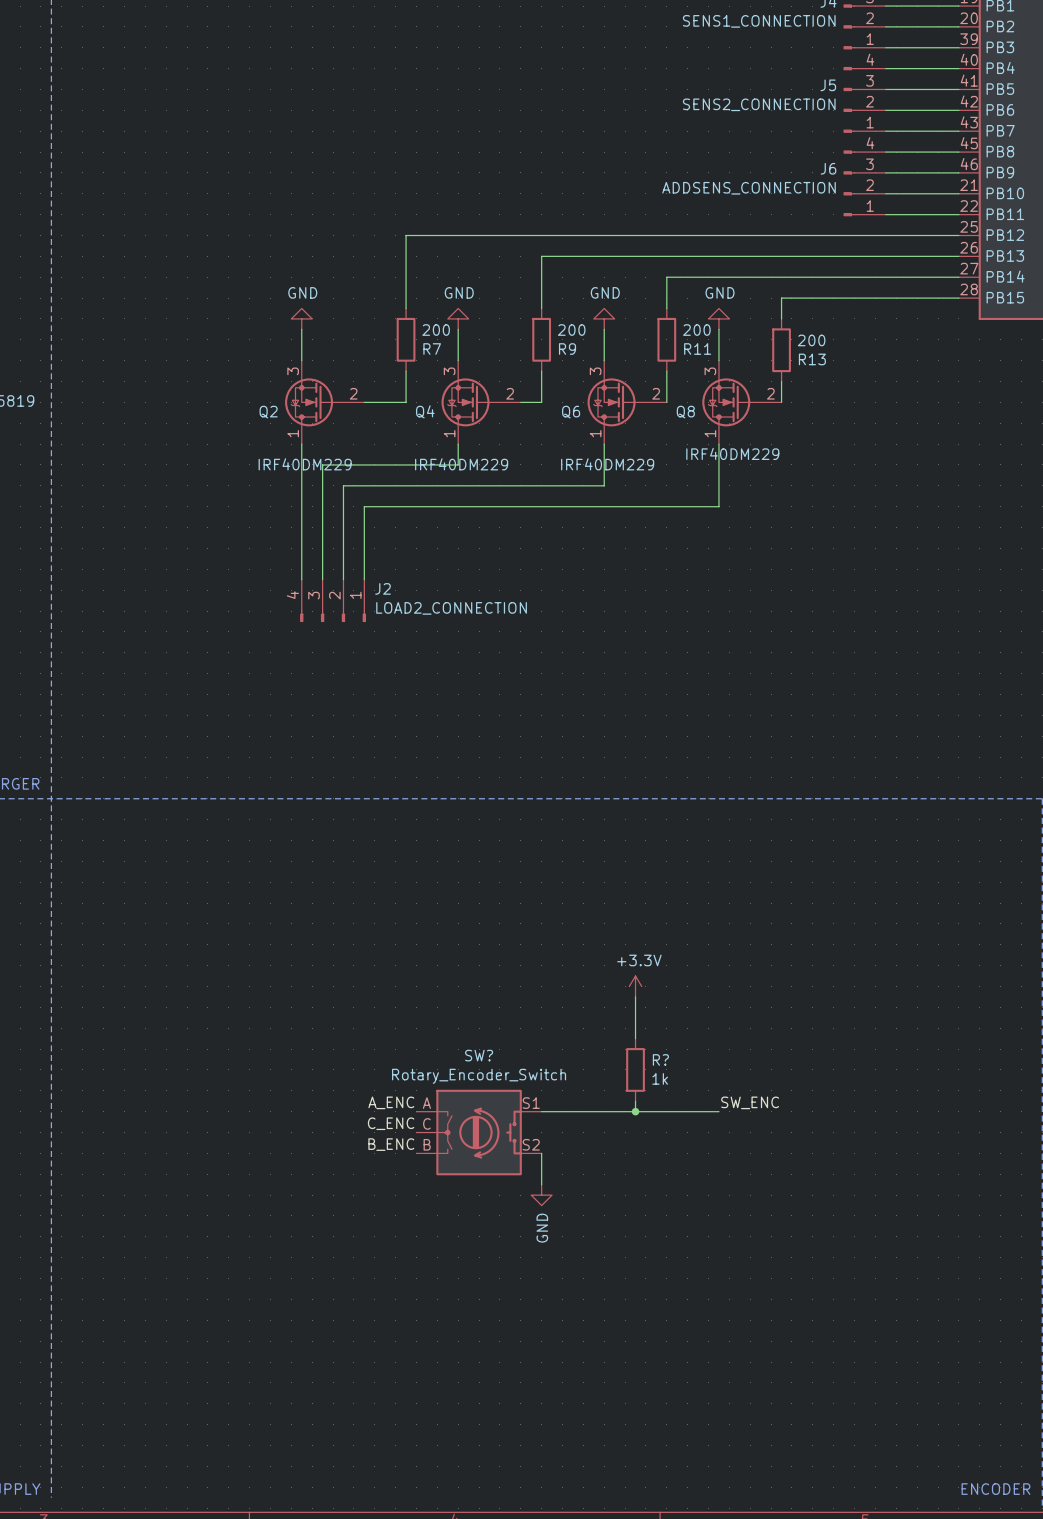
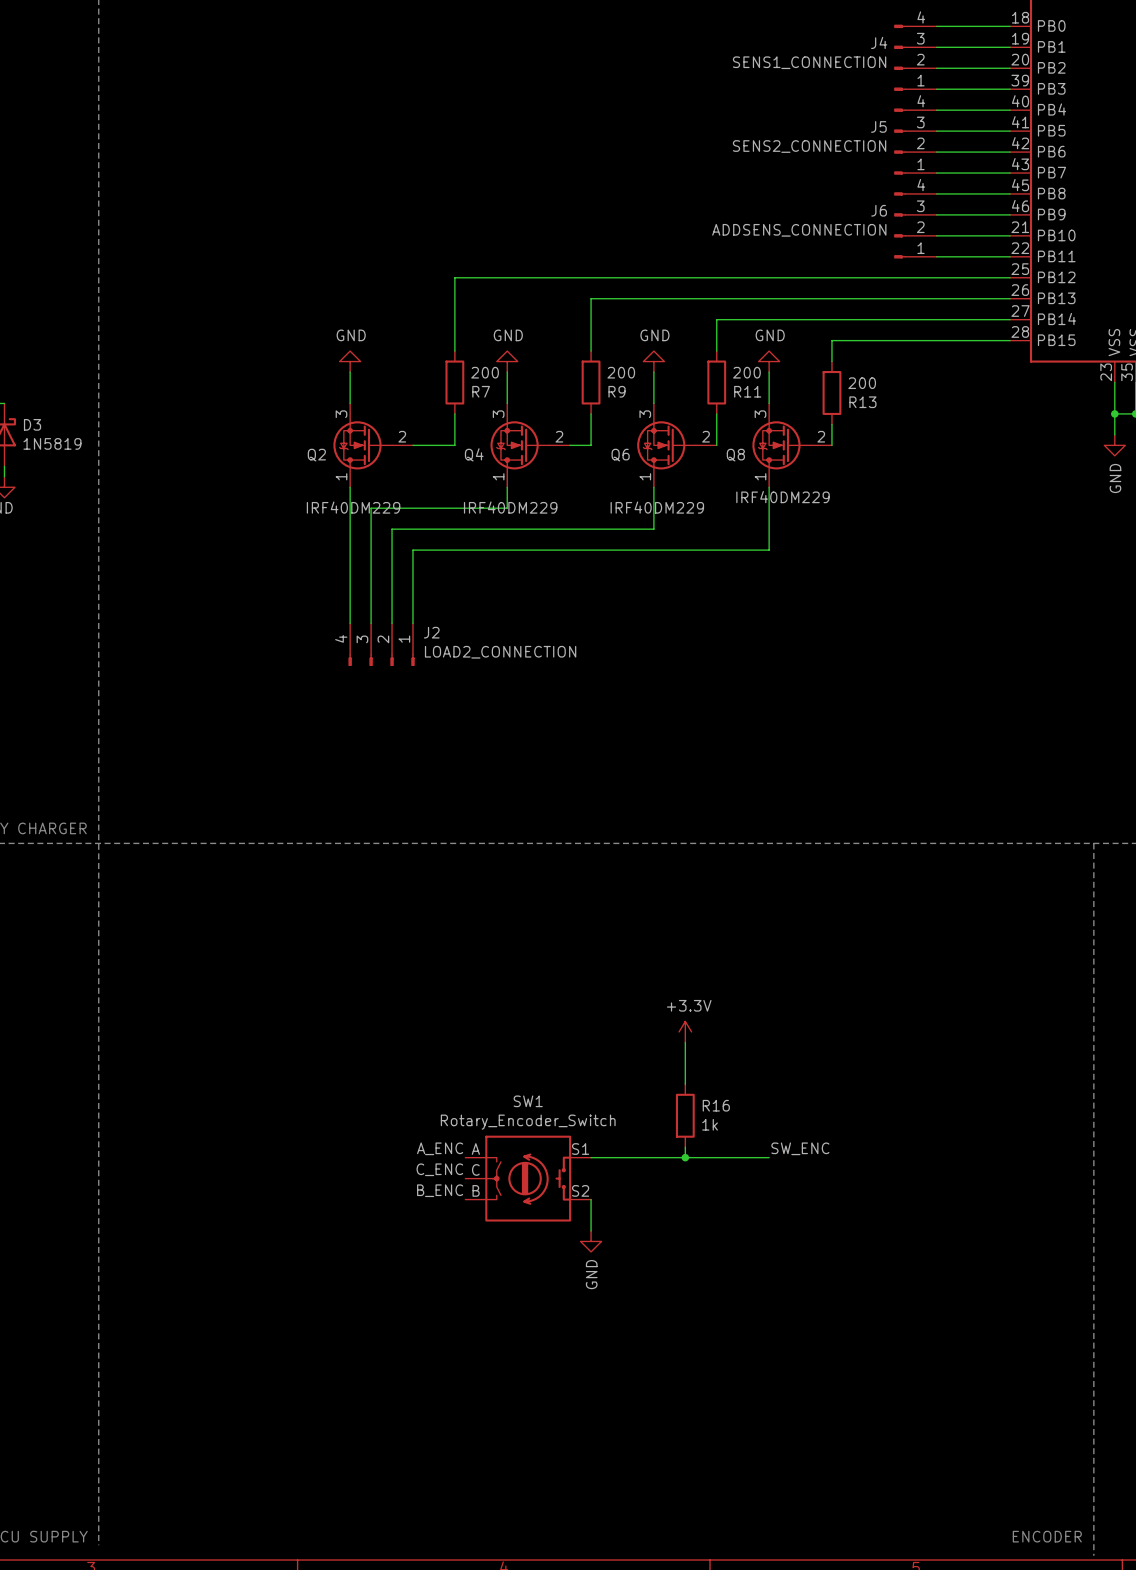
SW? name: SW? (479, 1055) -> SW1 (528, 1101)
R? name: R? (660, 1059) -> R16 (716, 1105)

